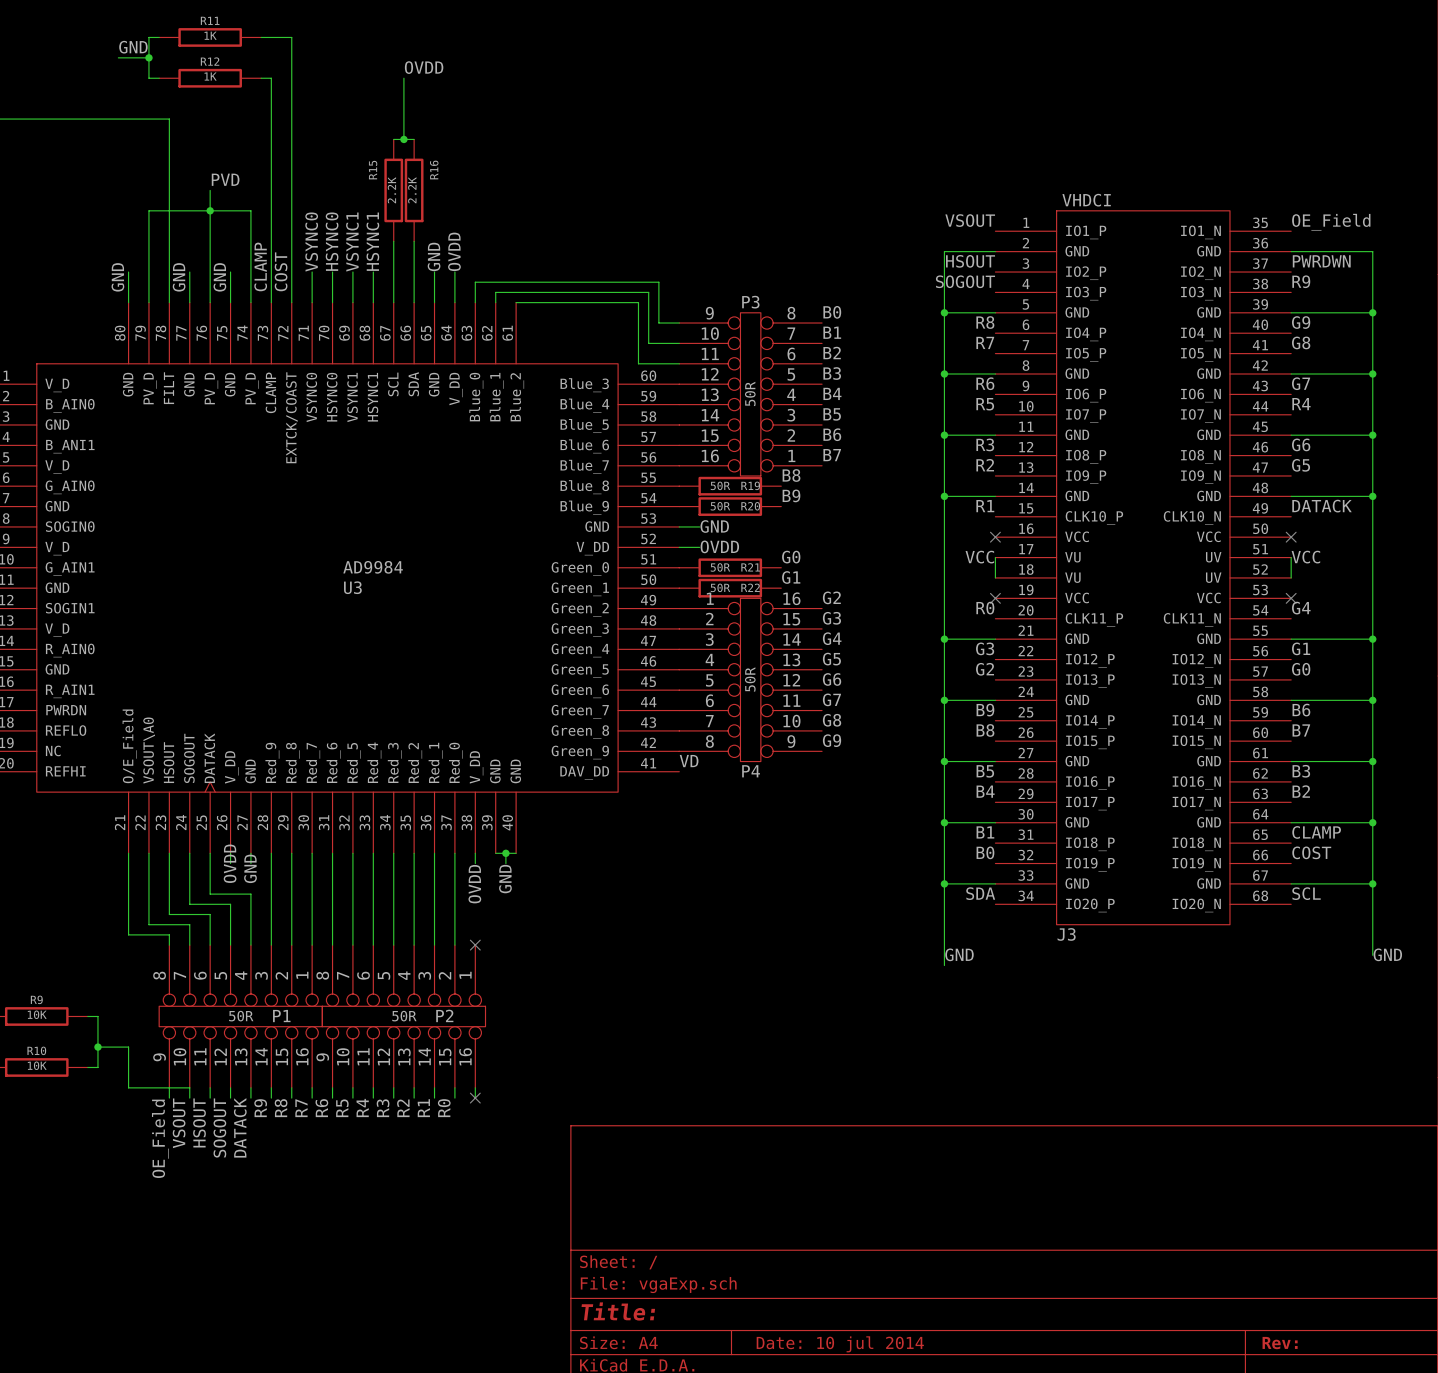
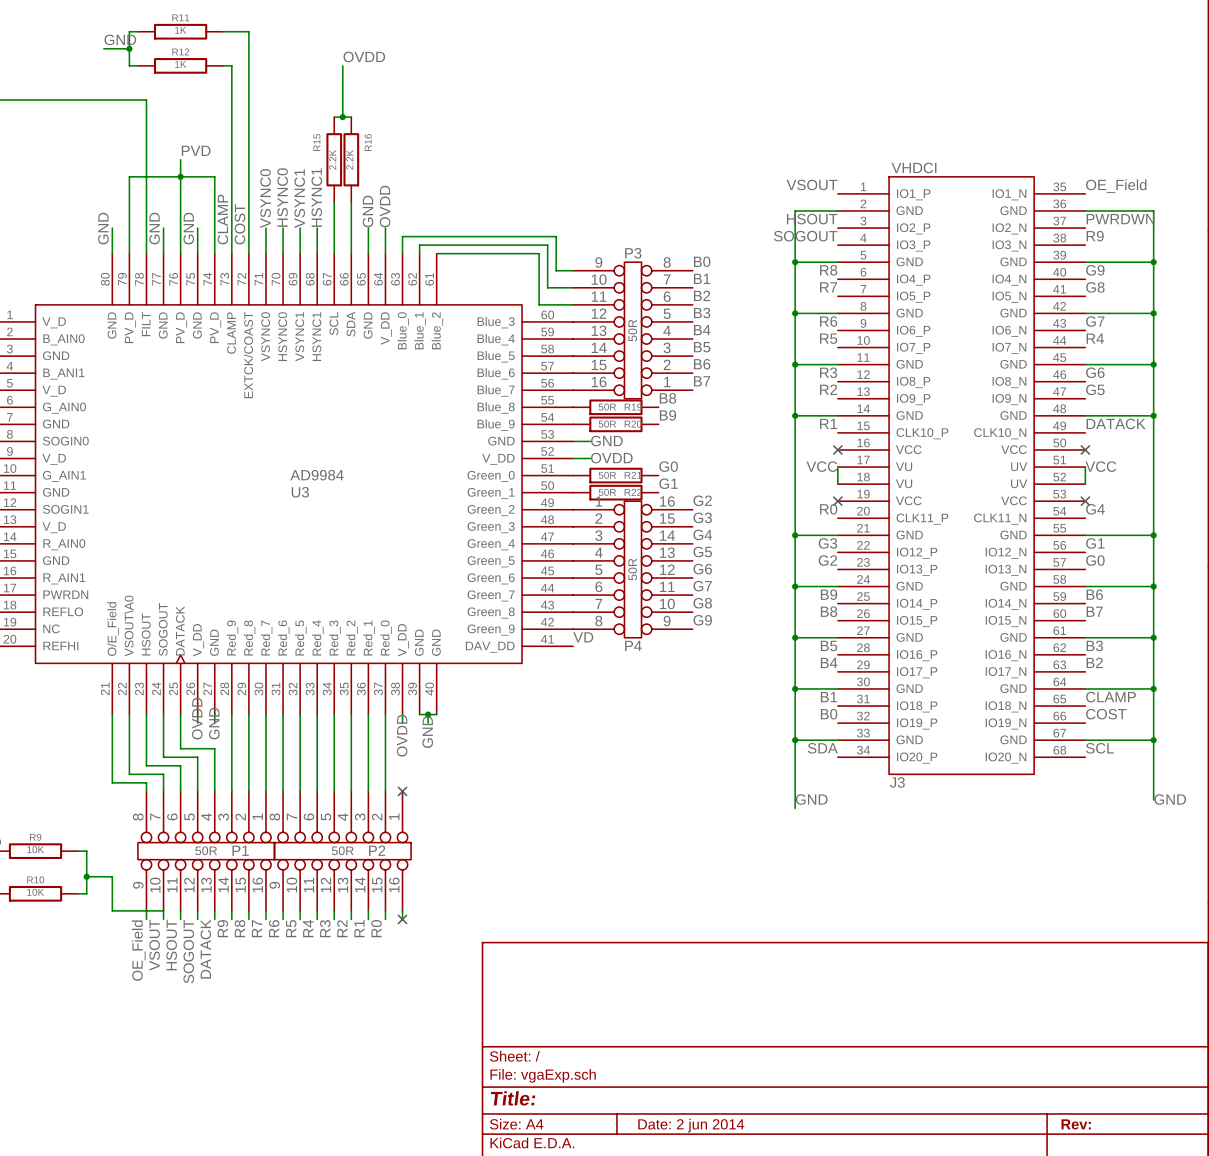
title block: Date: 10 jul 2014 (840, 1344) -> Date: 2 jun 2014 (691, 1125)

